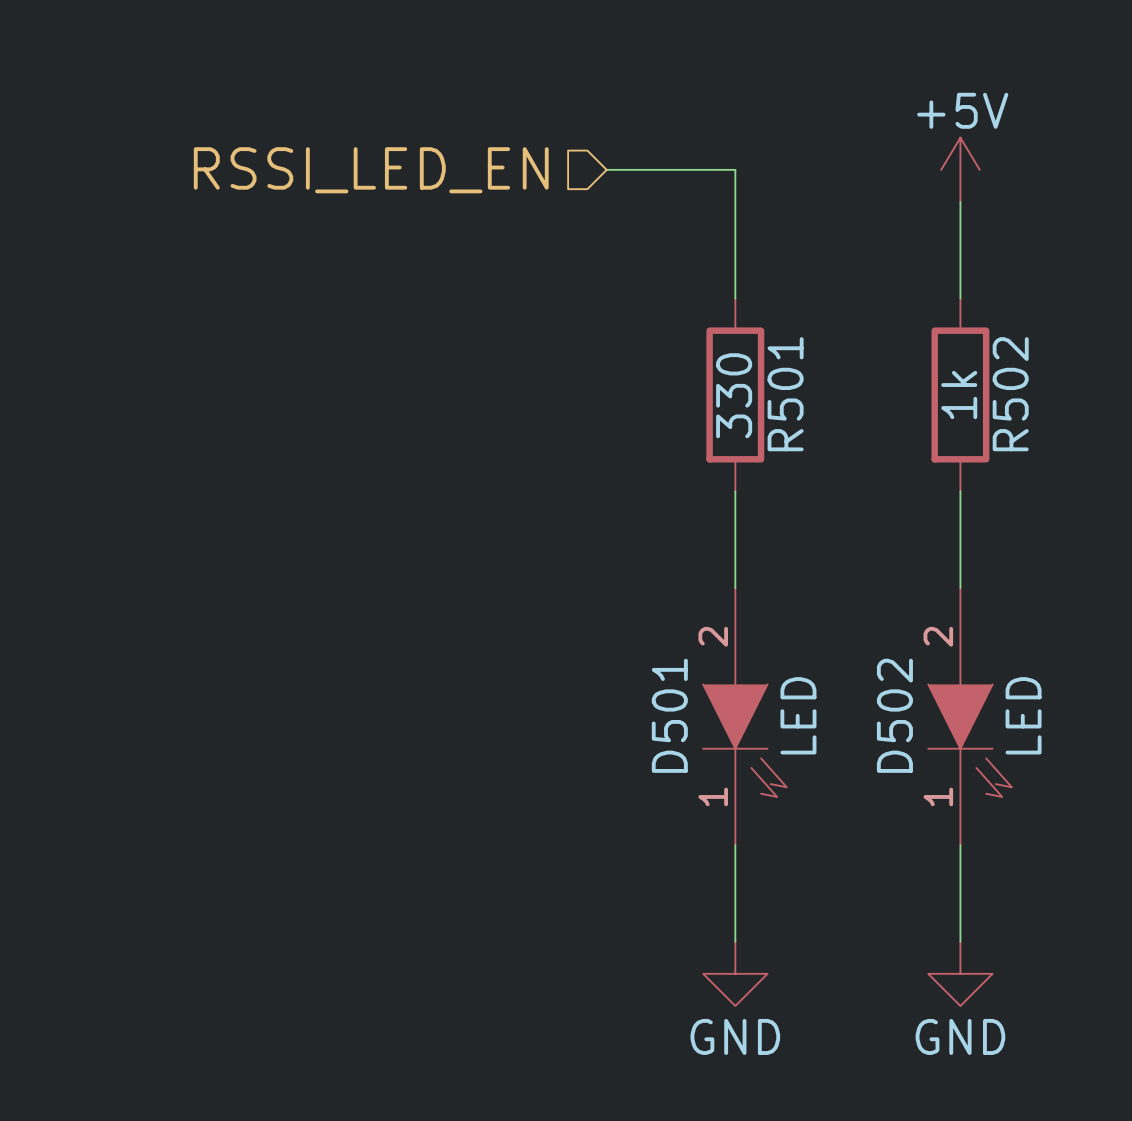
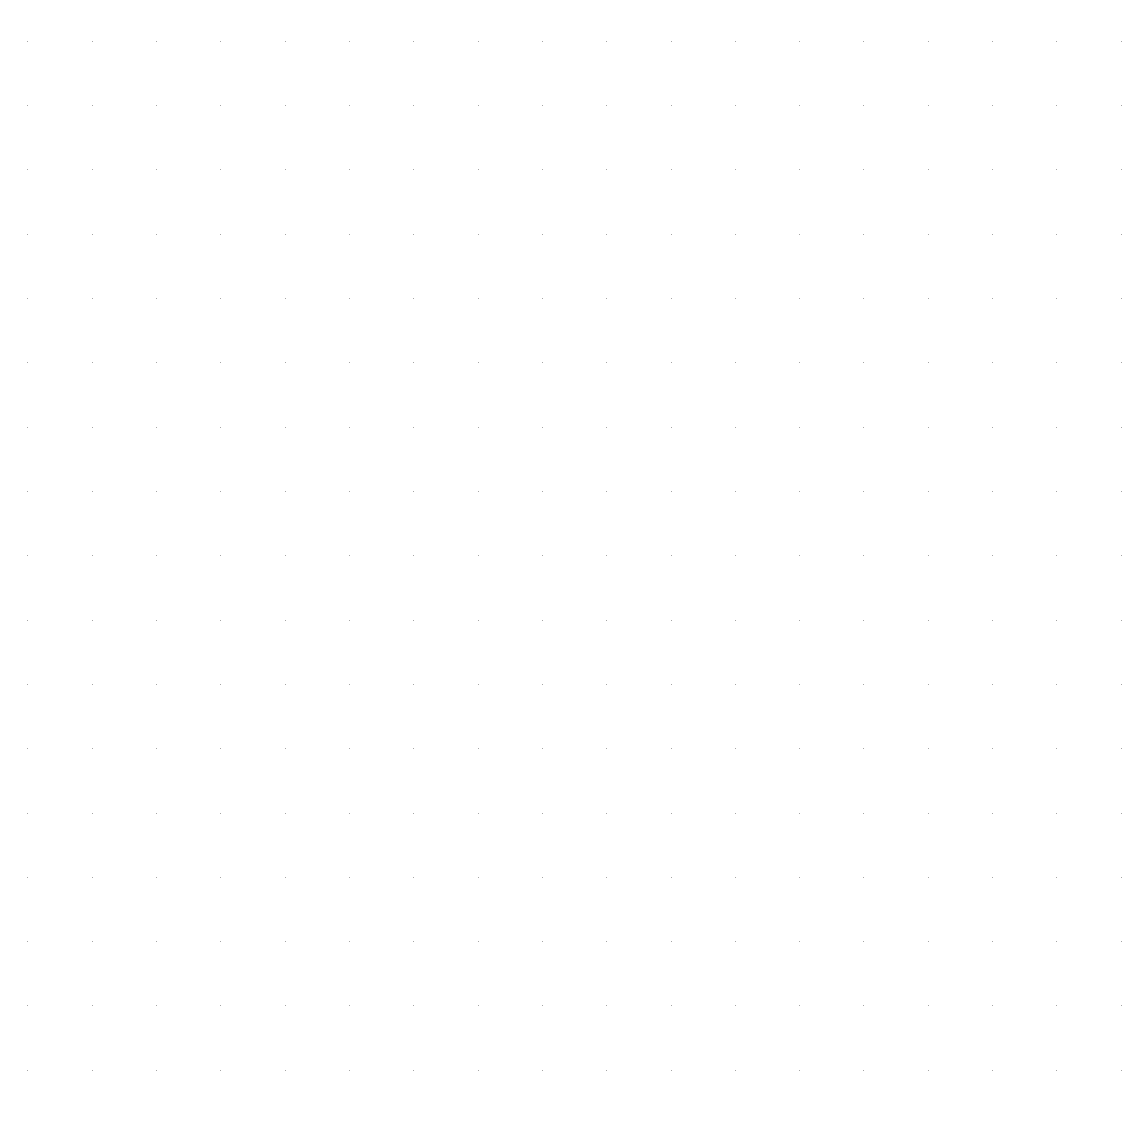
wire: (606, 169) (735, 169) (735, 298) -> none
power symbol: +5V (960, 169) -> none
hierarchical label: RSSI_LED_EN (371, 170) -> none
wire: (960, 202) (960, 298) -> none
R501: 330 (735, 394) -> none
R502: 1k (960, 394) -> none
wire: (735, 491) (735, 587) -> none
wire: (960, 491) (960, 587) -> none
D501: LED (744, 716) -> none
D502: LED (970, 716) -> none
wire: (735, 845) (735, 941) -> none
wire: (960, 845) (960, 941) -> none
power symbol: GND (735, 973) -> none
power symbol: GND (960, 973) -> none

